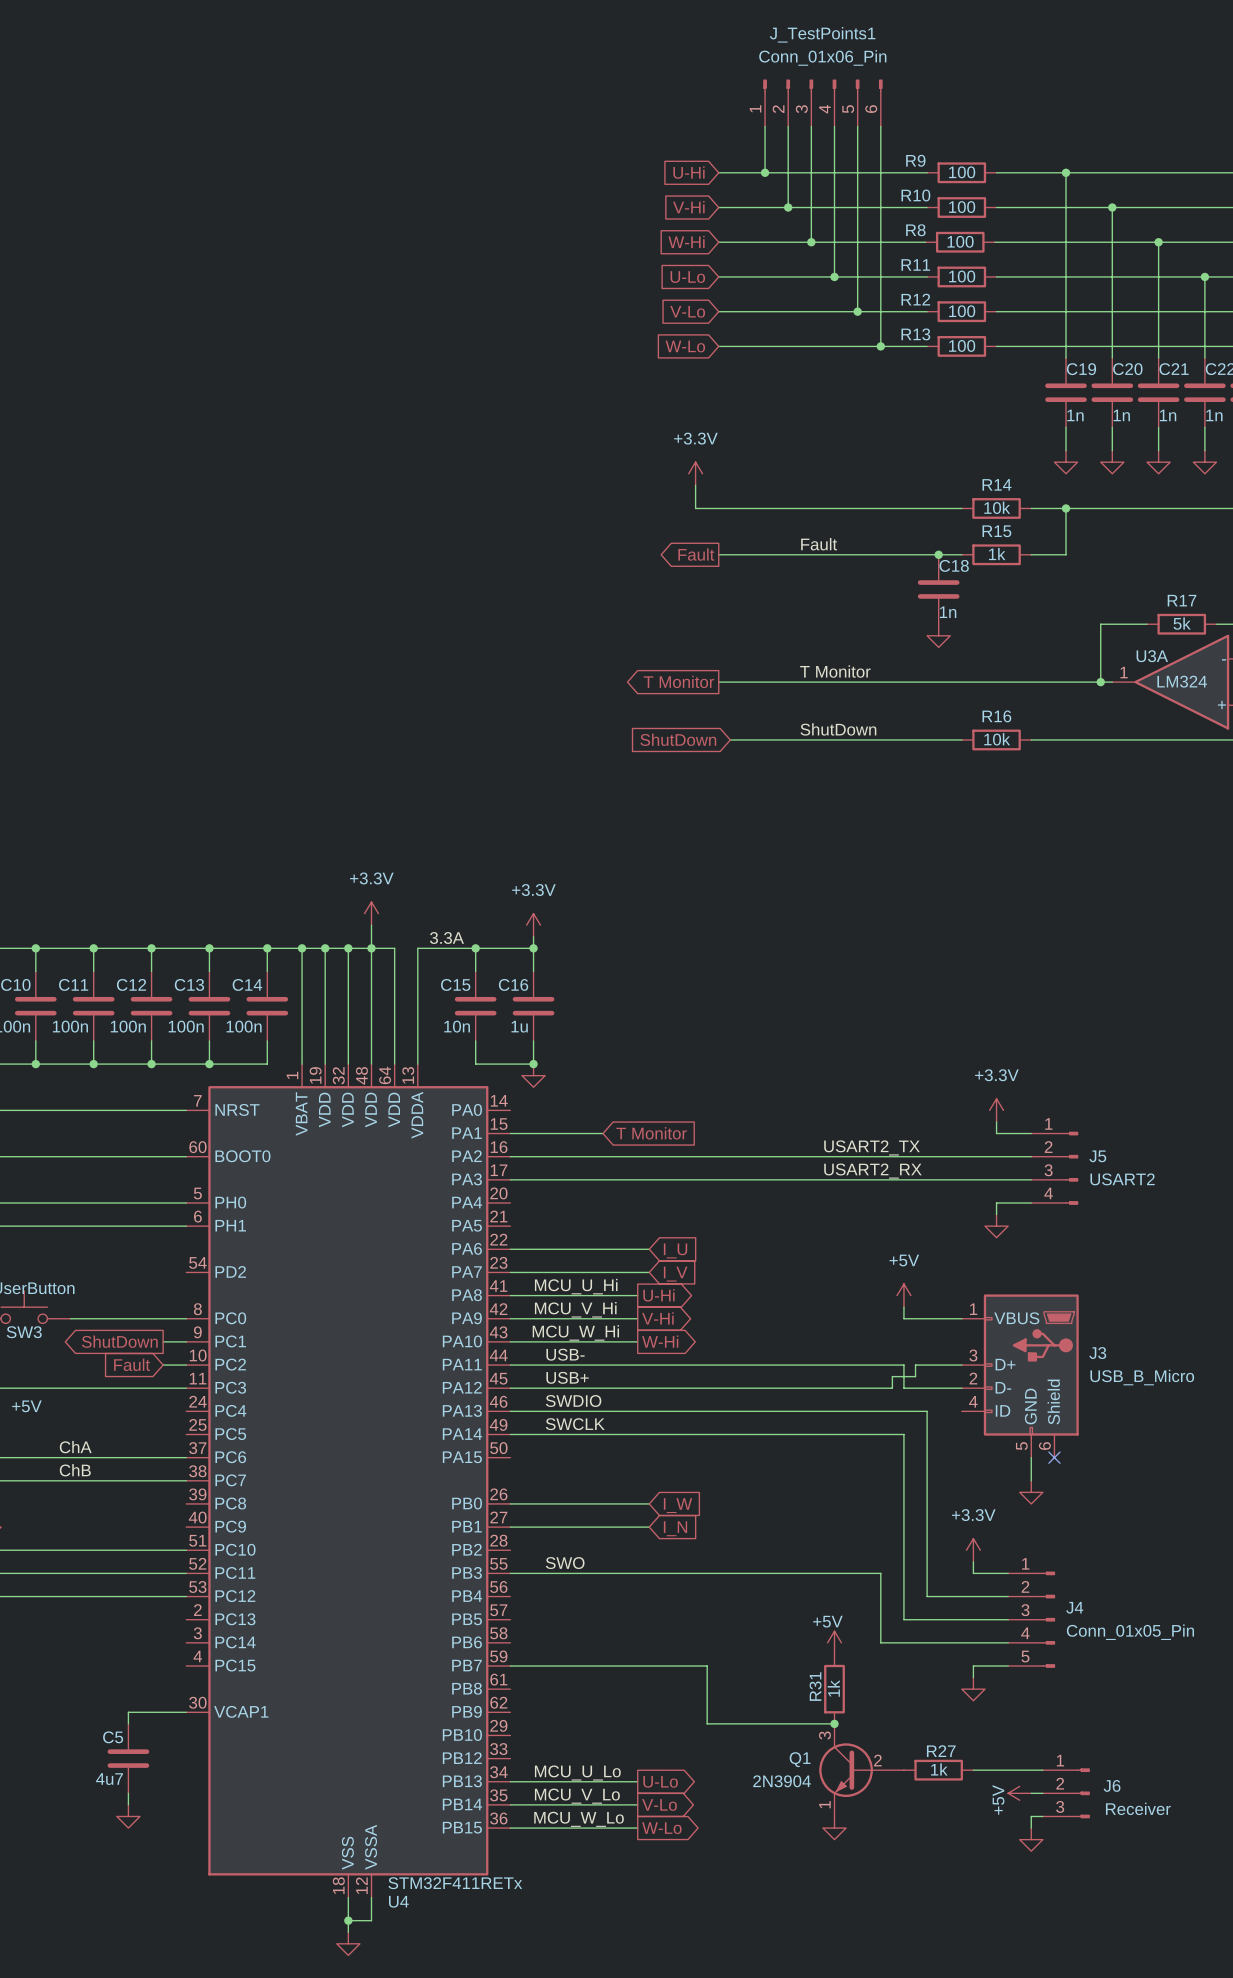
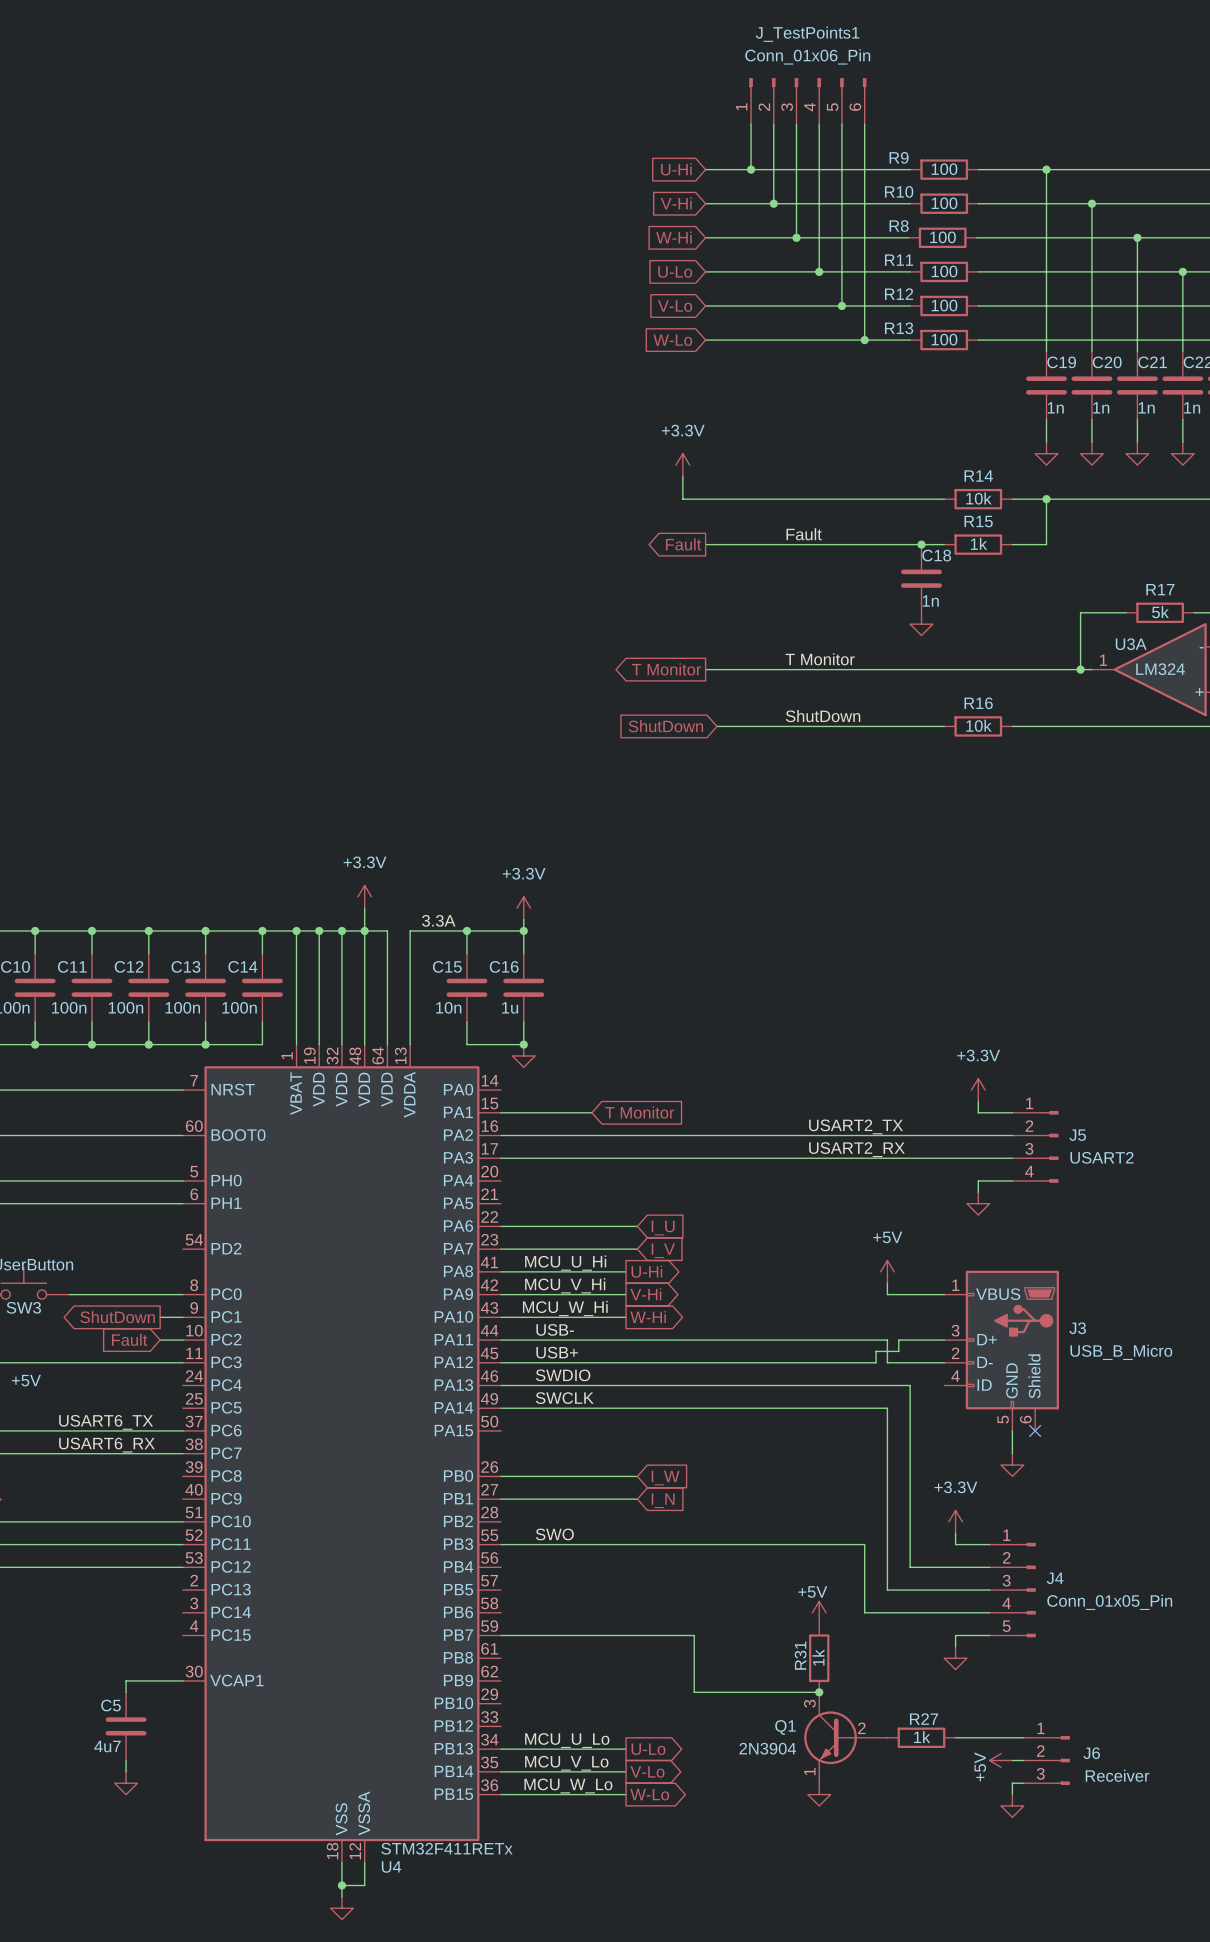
label: ChA (75, 1447) -> USART6_TX (106, 1422)
label: ChB (75, 1470) -> USART6_RX (106, 1445)

